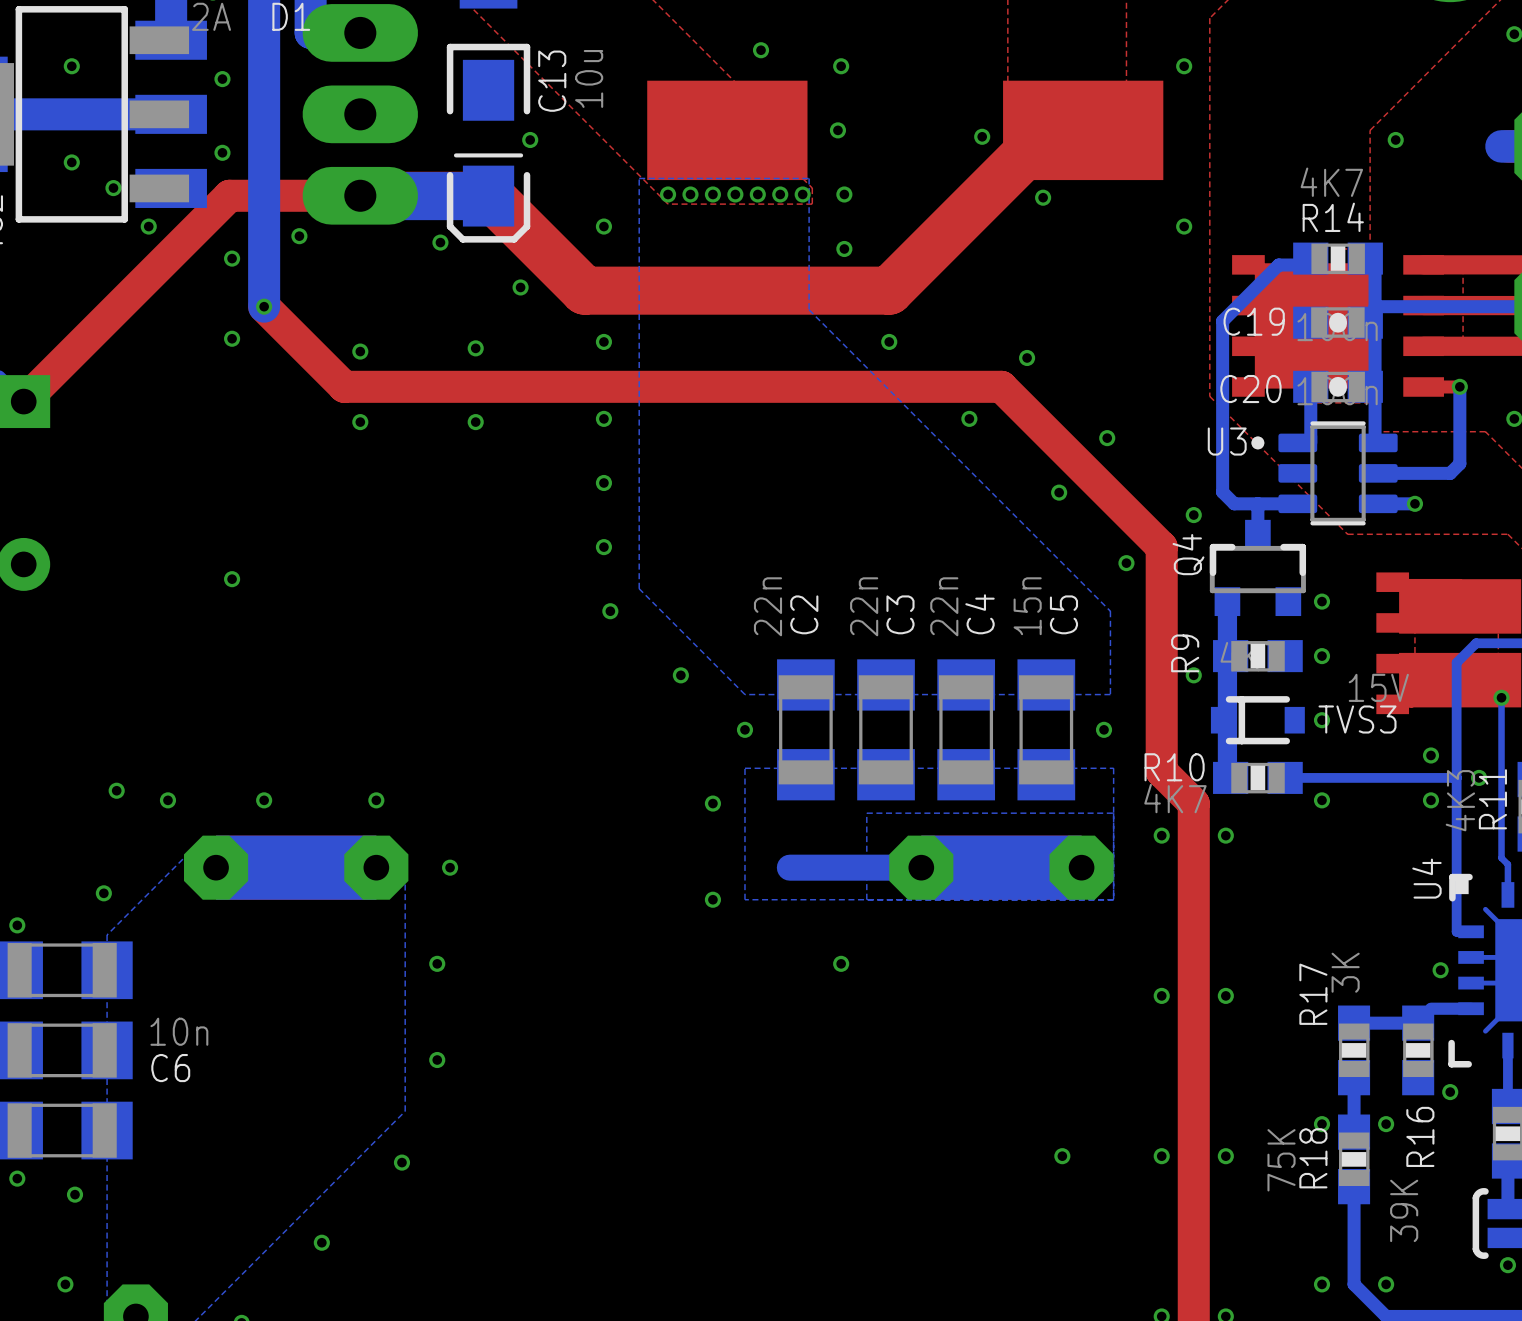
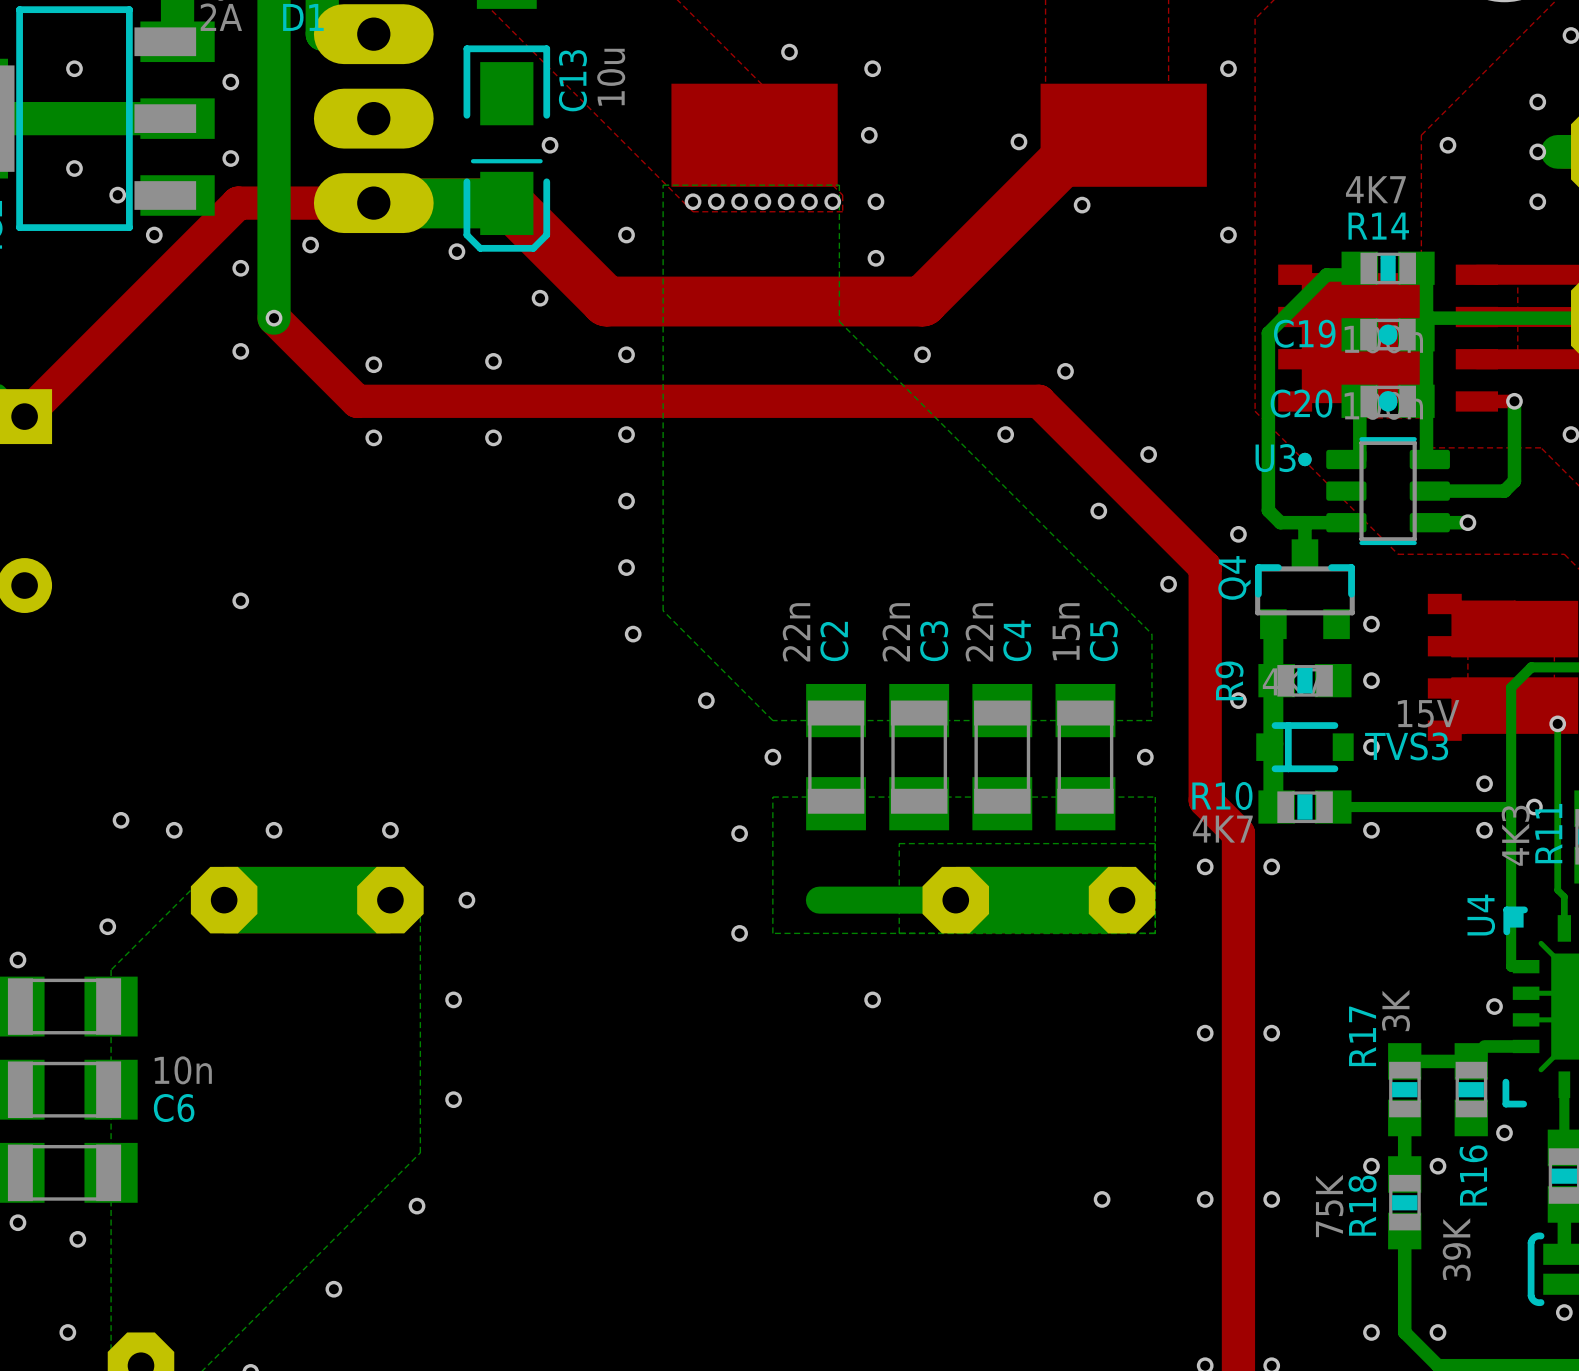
via: none -> (1537, 102)
via: none -> (1537, 151)
via: none -> (1537, 201)

